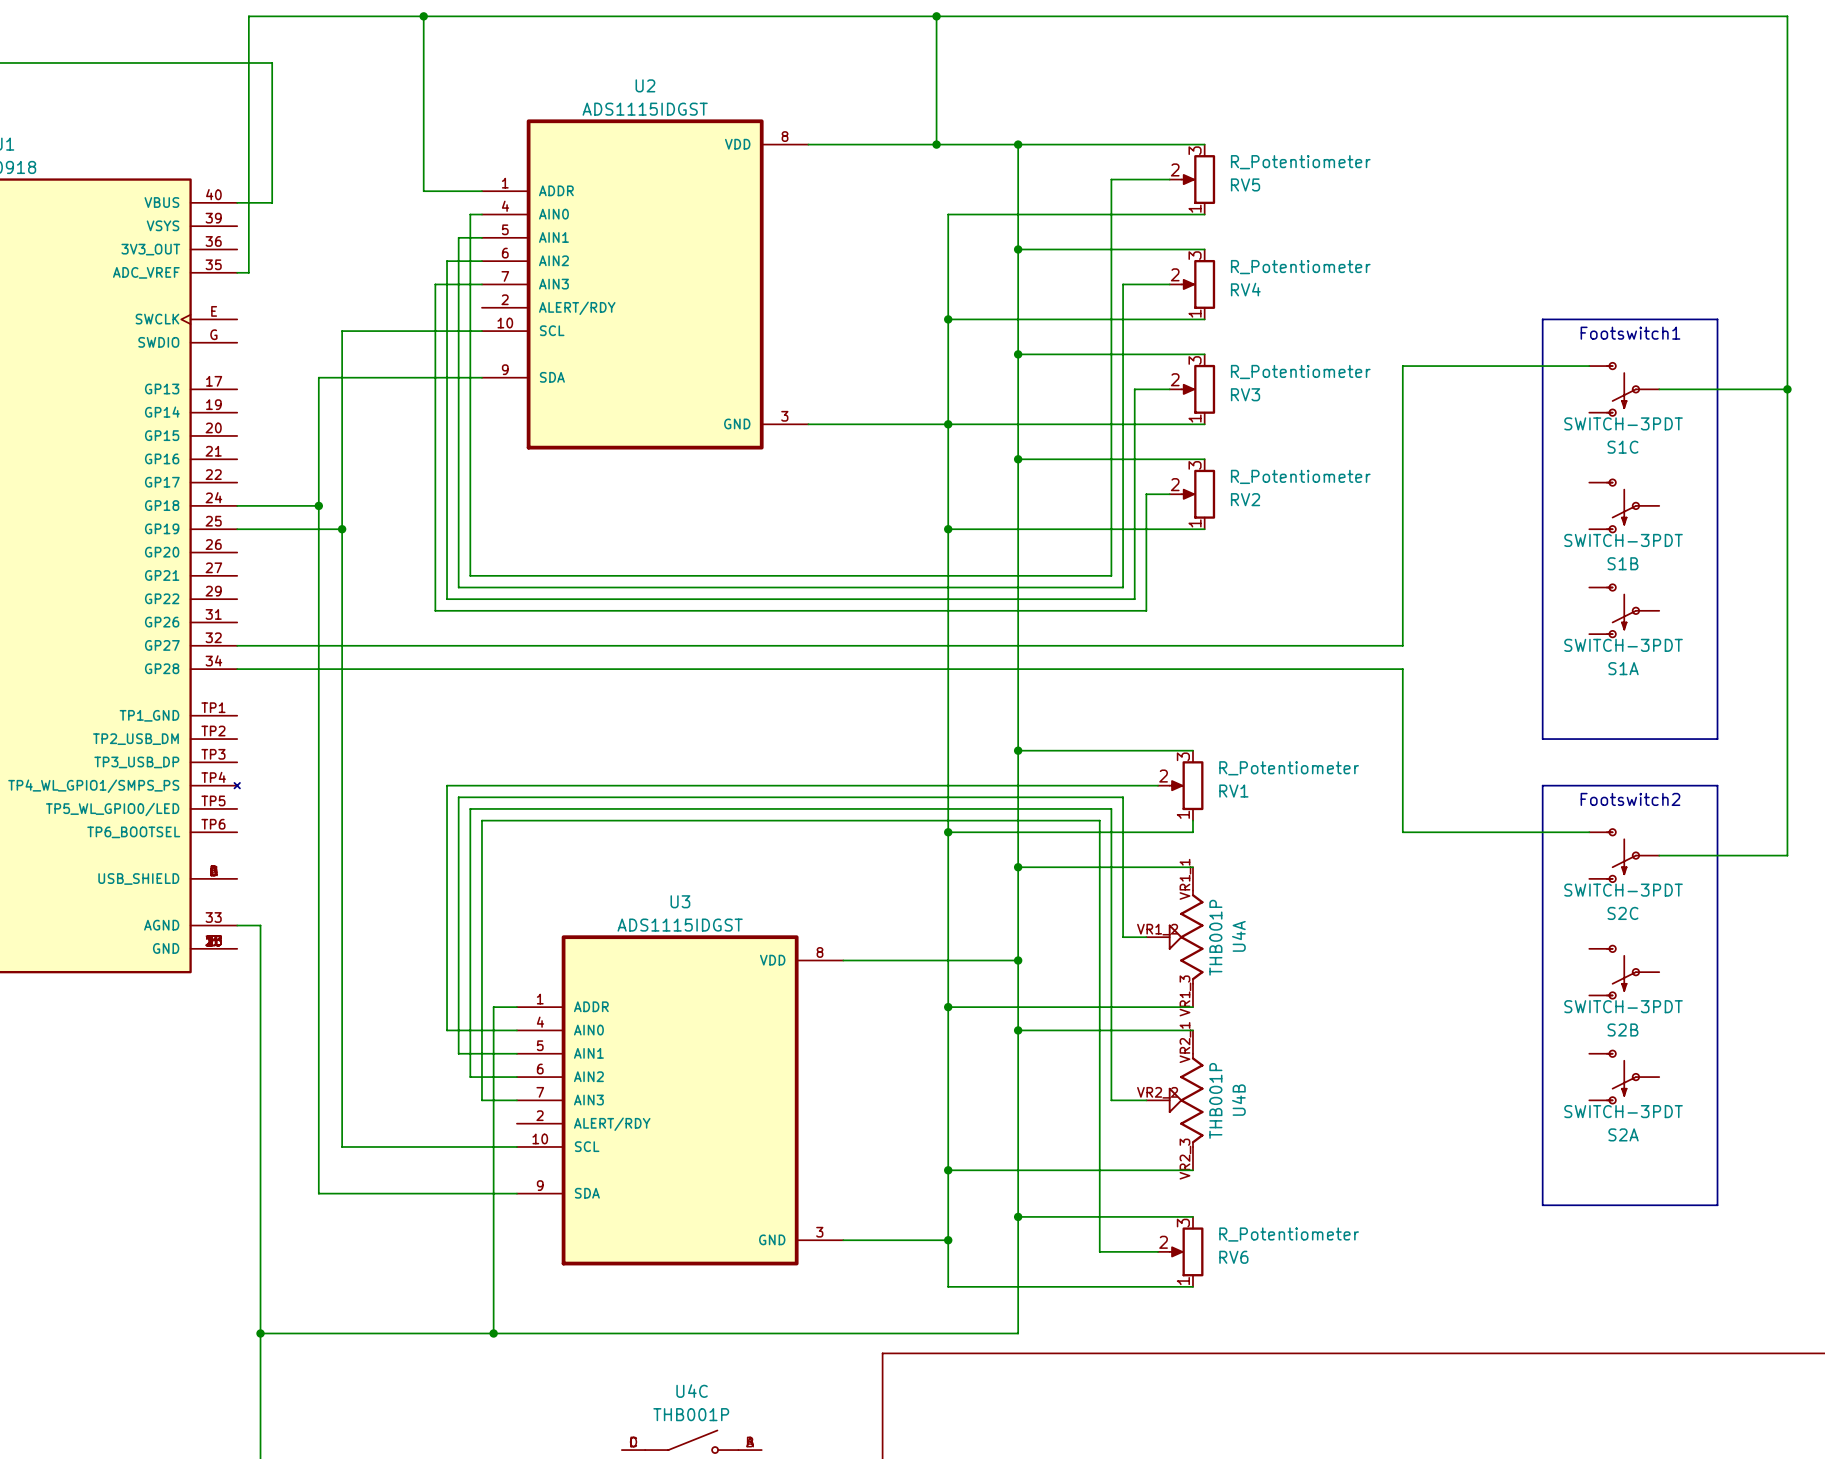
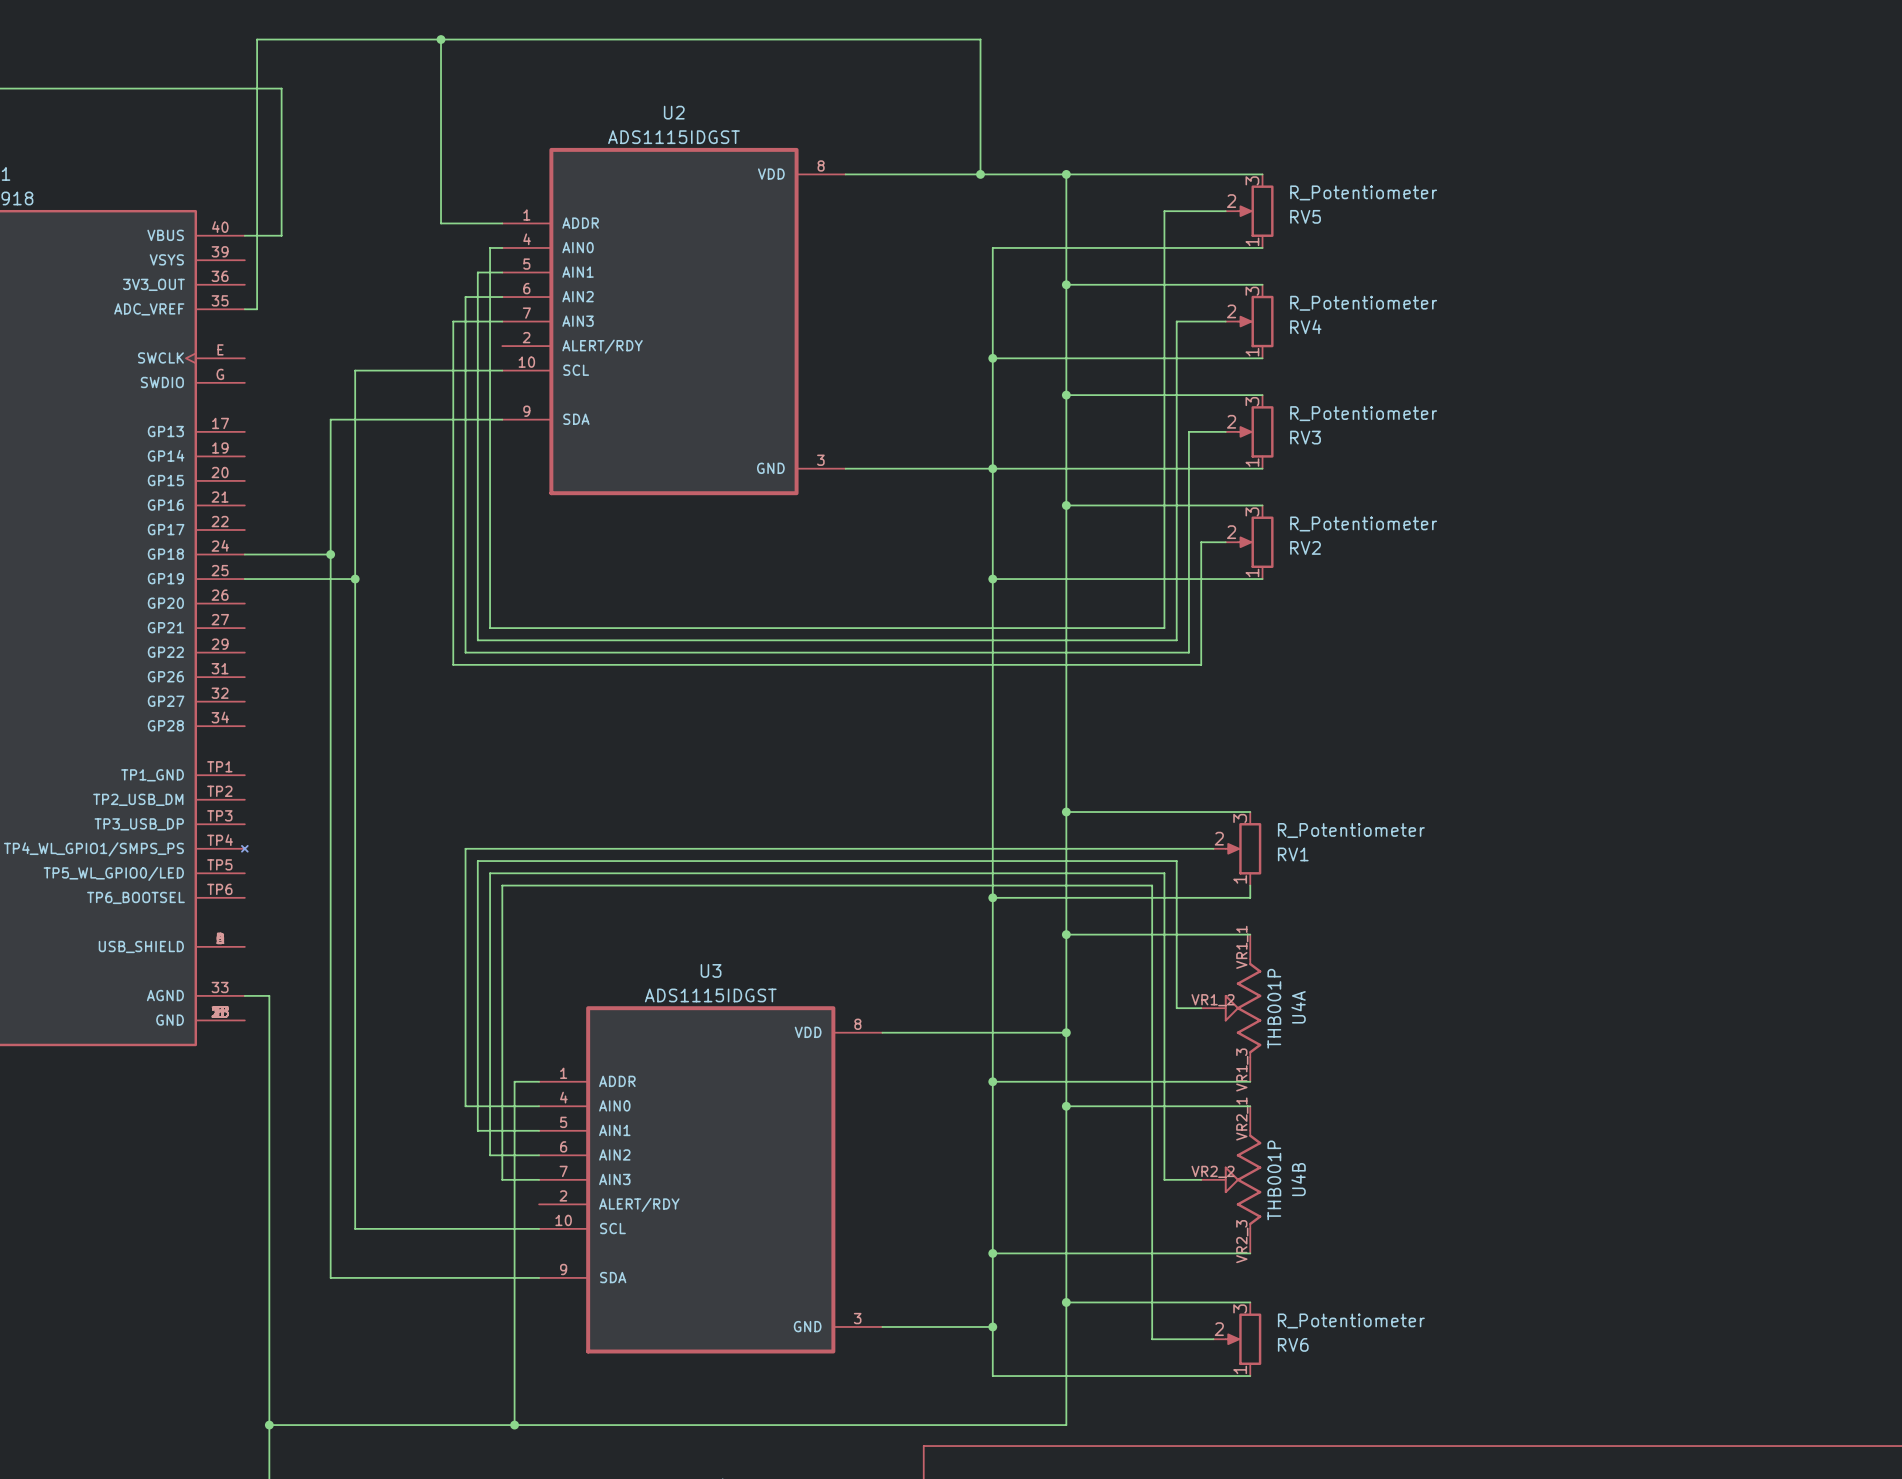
wire: (936, 16) (1787, 16) (1787, 855) (1659, 855) -> none
junction: (936, 16) -> none
line: (1542, 319) (1542, 739) (1717, 739) (1717, 319) (1542, 319) -> none
text: Footswitch1 (1630, 333) -> none
wire: (1589, 366) (1402, 366) (1402, 645) (237, 645) -> none
S1C: SWITCH-3PDT (1624, 389) -> none
wire: (1659, 389) (1787, 389) -> none
junction: (1787, 389) -> none
S1B: SWITCH-3PDT (1624, 505) -> none
S1A: SWITCH-3PDT (1624, 610) -> none
wire: (237, 669) (1402, 669) (1402, 832) (1589, 832) -> none
line: (1542, 785) (1717, 785) (1717, 1205) (1542, 1205) (1542, 785) -> none
text: Footswitch2 (1630, 799) -> none
S2C: SWITCH-3PDT (1624, 855) -> none
S2B: SWITCH-3PDT (1624, 972) -> none
S2A: SWITCH-3PDT (1624, 1077) -> none

